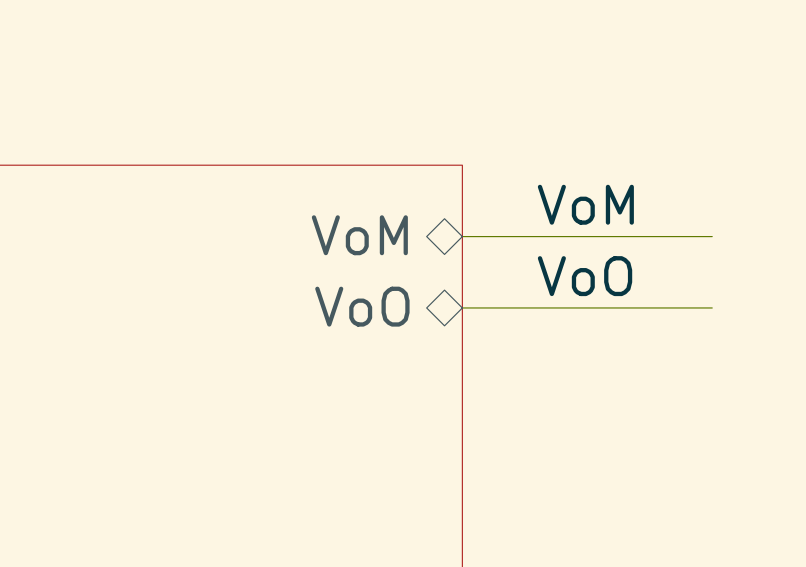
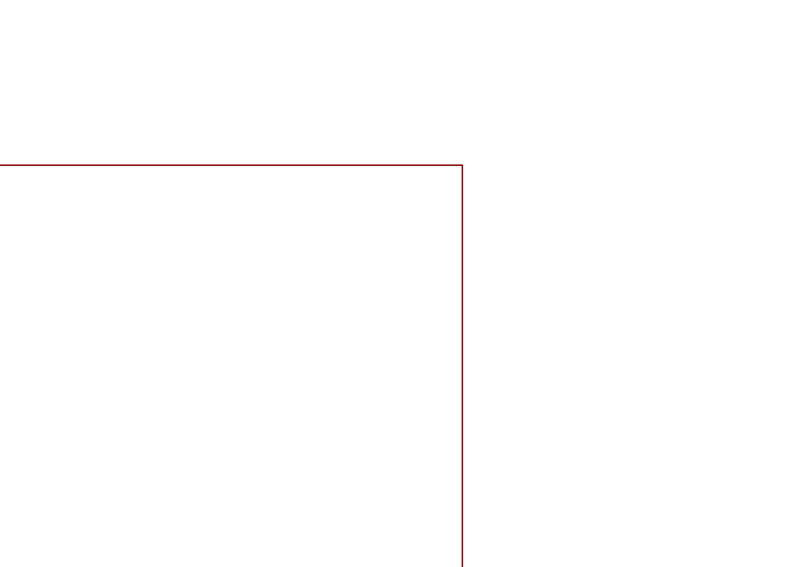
label: VoM (585, 204) -> none
sheet pin: VoM (359, 235) -> none
wire: (462, 236) (712, 236) -> none
label: VoO (585, 276) -> none
sheet pin: VoO (362, 306) -> none
wire: (462, 307) (712, 307) -> none

